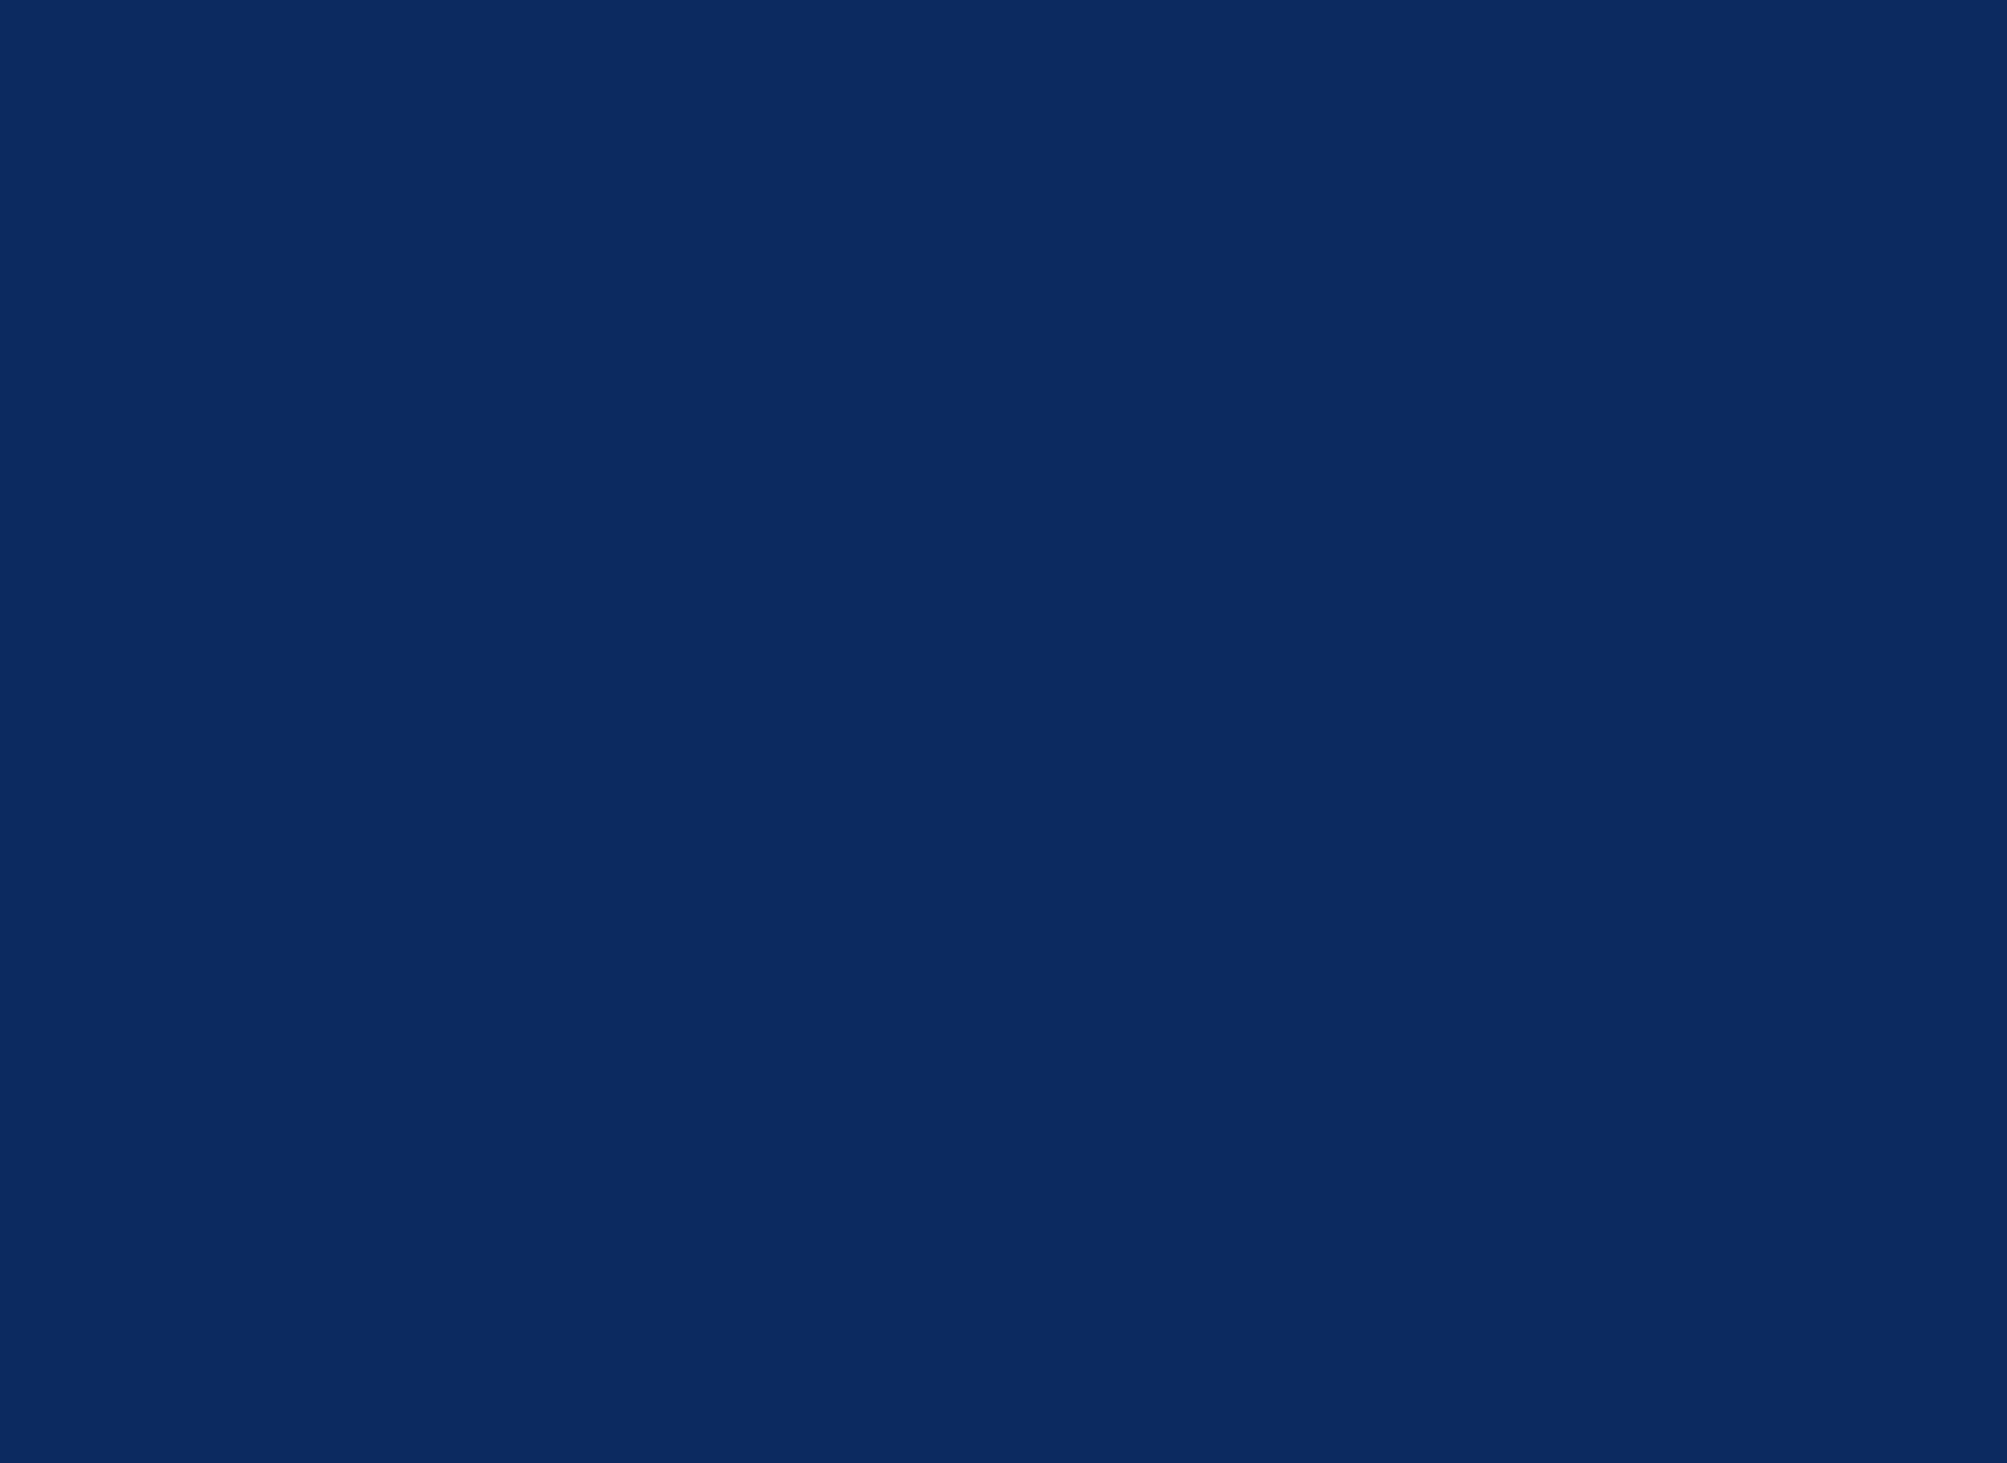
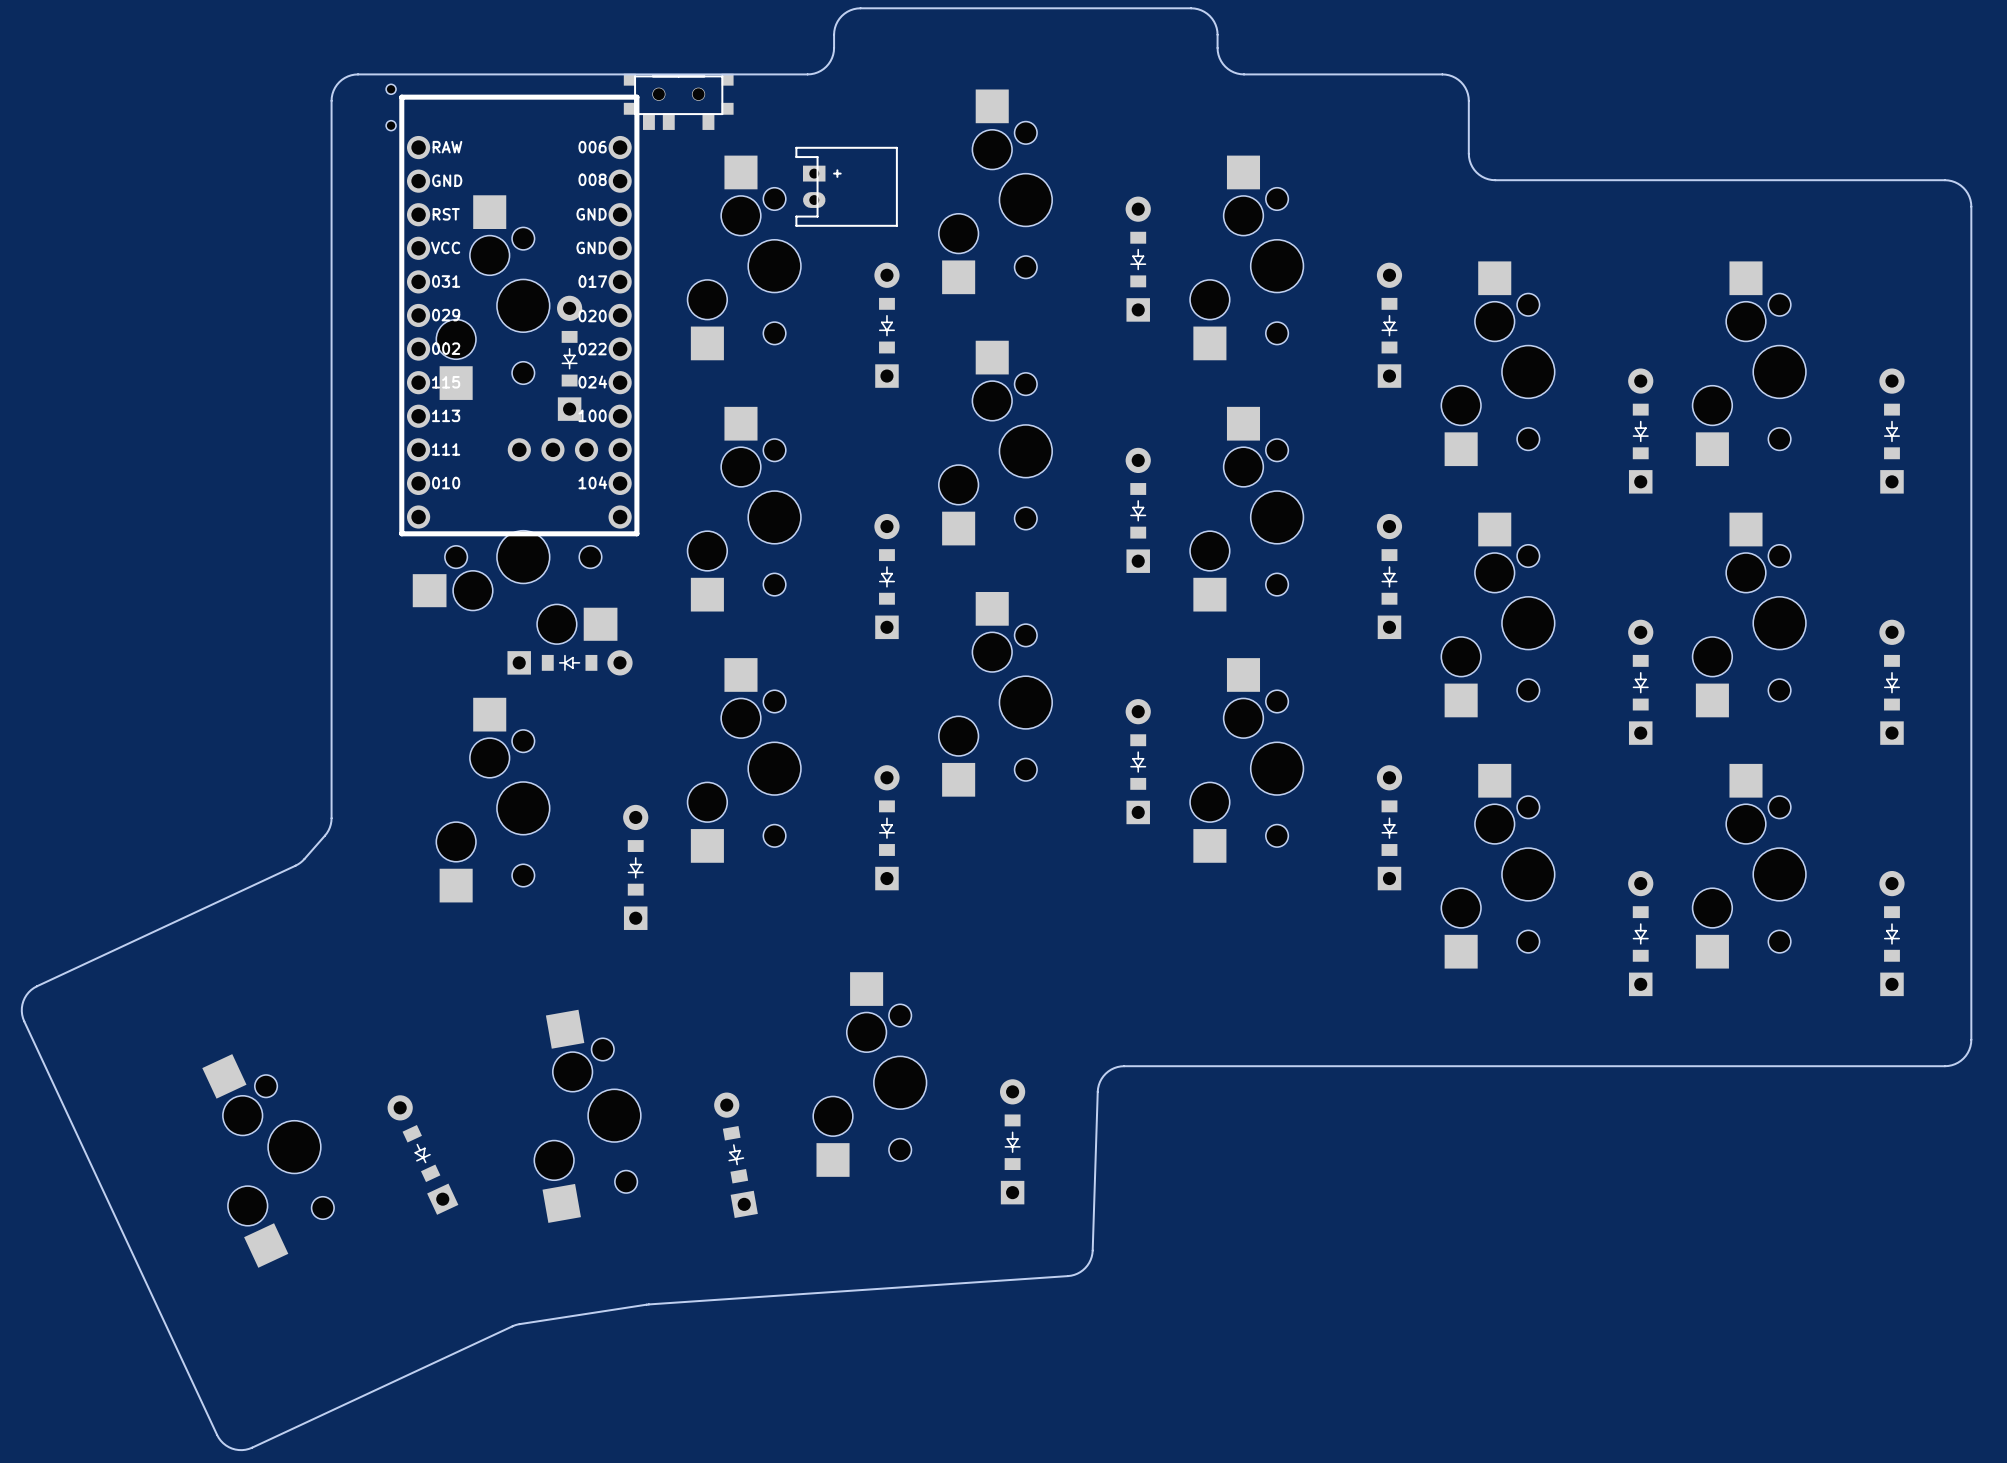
board edge: none -> (1191, 8) (857, 8) (847, 11) (839, 18) (834, 27) (833, 51) (830, 61) (823, 68) (811, 74) (358, 74) (347, 76) (337, 84) (331, 100) (331, 818) (329, 827) (324, 835) (298, 864) (37, 986) (26, 995) (21, 1007) (24, 1021) (217, 1434) (225, 1445) (238, 1450) (252, 1447) (517, 1324) (647, 1304) (1068, 1276) (1077, 1273) (1087, 1265) (1092, 1253) (1098, 1088) (1103, 1076) (1117, 1067) (1944, 1066) (1955, 1064) (1965, 1055) (1971, 1039) (1971, 206) (1965, 190) (1955, 182) (1944, 180) (1488, 179) (1476, 172) (1469, 160) (1468, 97) (1465, 87) (1455, 77) (1442, 74) (1237, 73) (1227, 68) (1219, 58) (1217, 31) (1212, 18) (1204, 11) (1191, 8)
part: none -> (678, 101)
part: none -> (391, 107)
part: none -> (846, 186)
part: none -> (995, 191)
part: none -> (744, 257)
part: none -> (1246, 257)
part: none -> (1138, 259)
part: none -> (492, 297)
part: none -> (519, 315)
part: none -> (886, 325)
part: none -> (1389, 325)
part: none -> (569, 358)
part: none -> (1498, 363)
part: none -> (1749, 363)
part: none -> (1640, 431)
part: none -> (1891, 431)
part: none -> (995, 443)
part: none -> (744, 509)
part: none -> (1246, 509)
part: none -> (1138, 510)
part: none -> (886, 576)
part: none -> (1389, 576)
part: none -> (515, 587)
part: none -> (1498, 614)
part: none -> (1749, 614)
part: none -> (570, 662)
part: none -> (1640, 682)
part: none -> (1891, 682)
part: none -> (995, 694)
part: none -> (744, 760)
part: none -> (1246, 760)
part: none -> (1138, 761)
part: none -> (492, 800)
part: none -> (886, 827)
part: none -> (1389, 827)
part: none -> (1498, 866)
part: none -> (1749, 866)
part: none -> (635, 867)
part: none -> (1640, 933)
part: none -> (1891, 933)
part: none -> (869, 1074)
part: none -> (587, 1116)
part: none -> (1012, 1141)
part: none -> (422, 1155)
part: none -> (736, 1155)
part: none -> (268, 1160)

